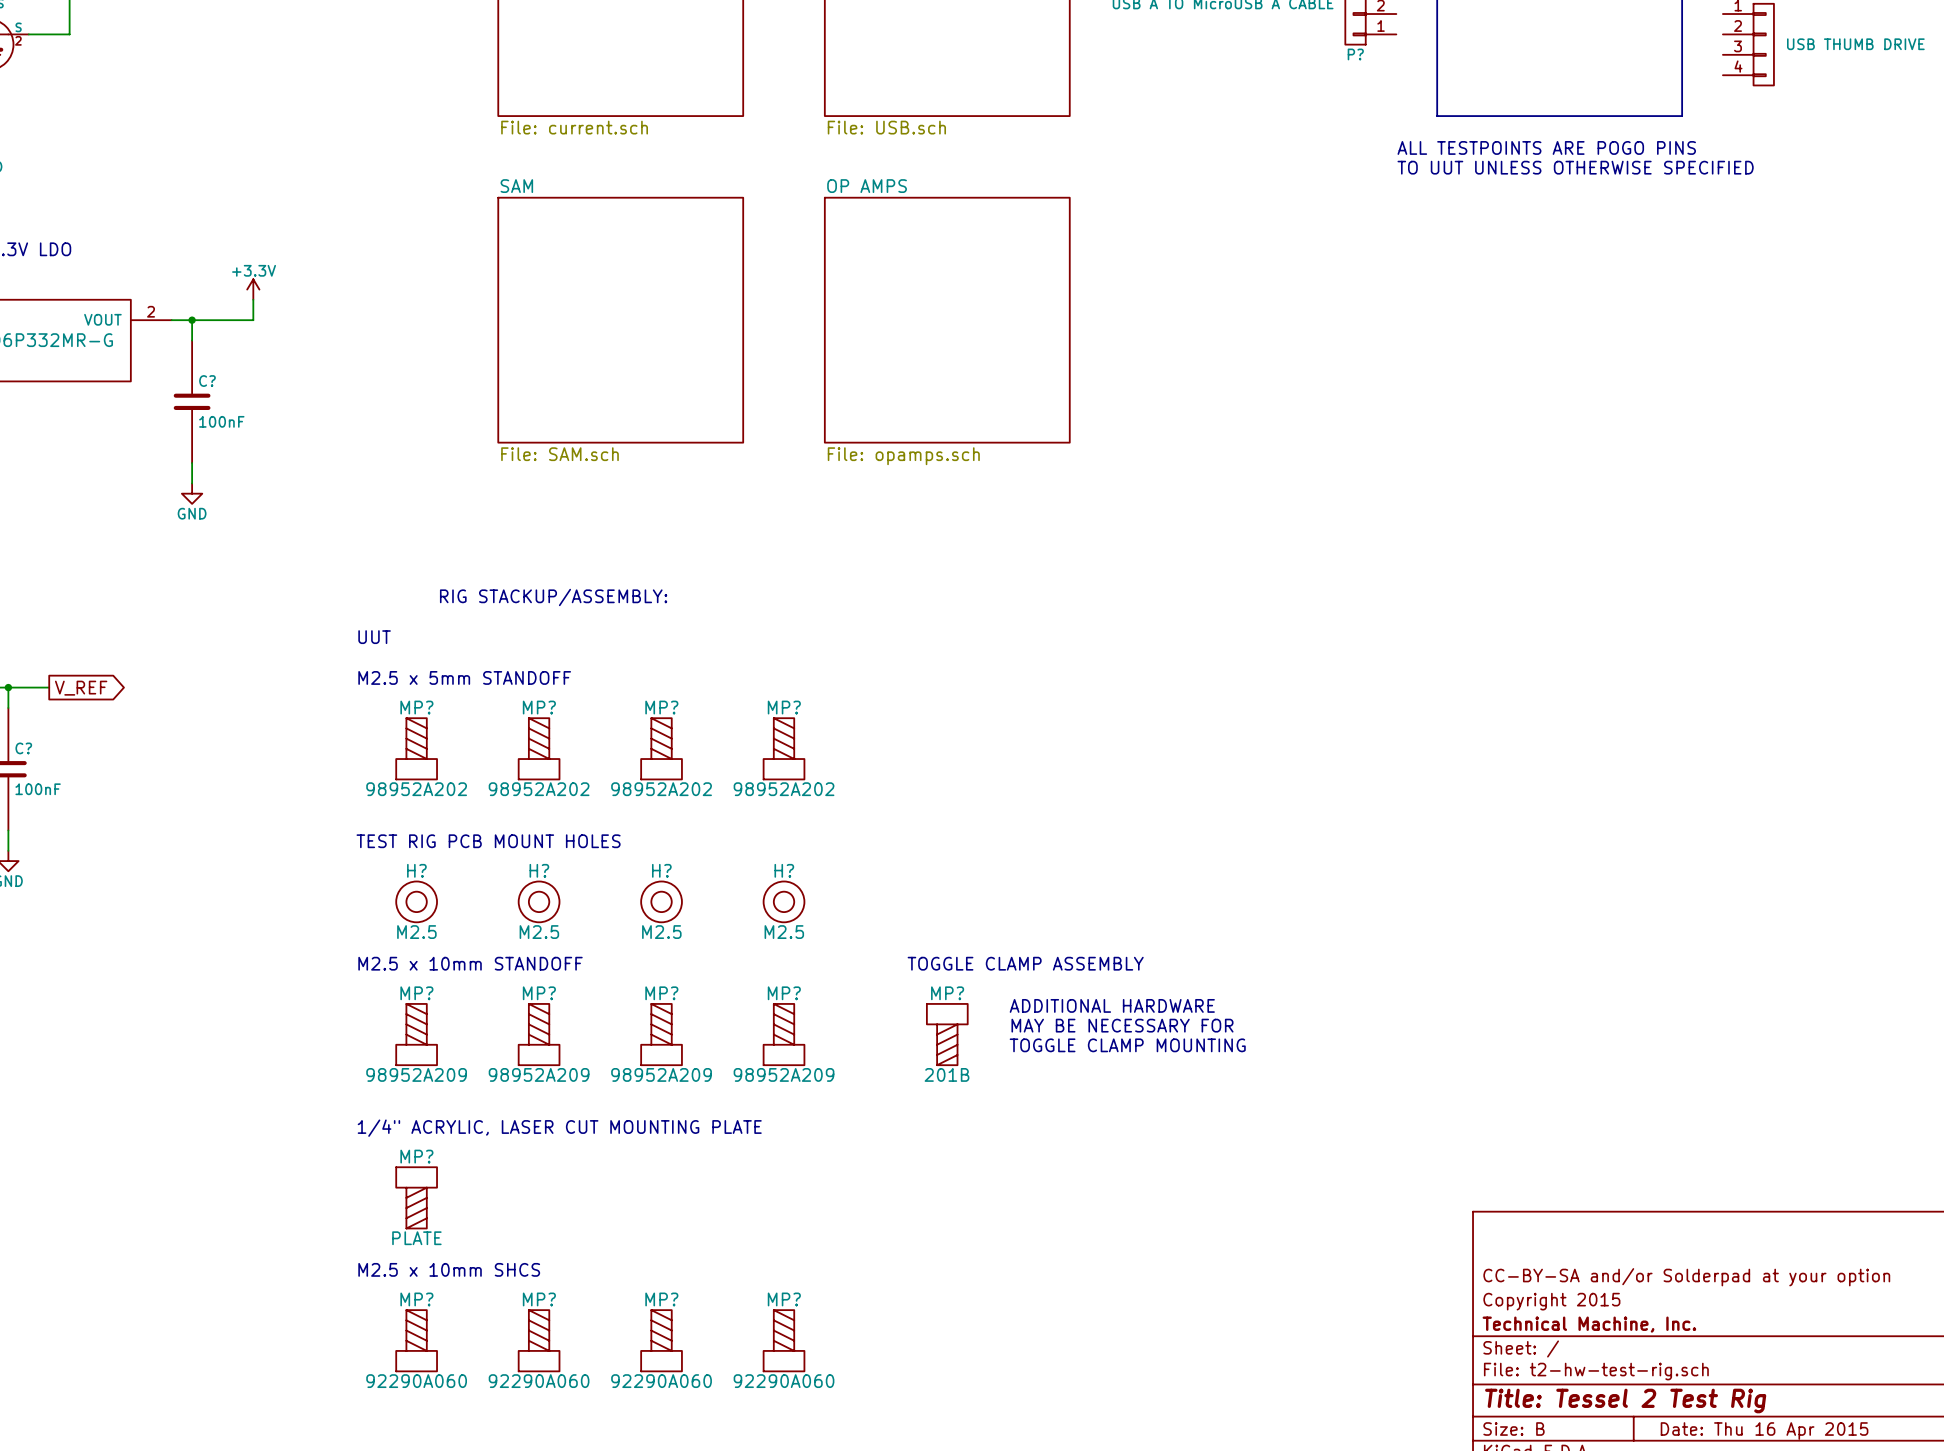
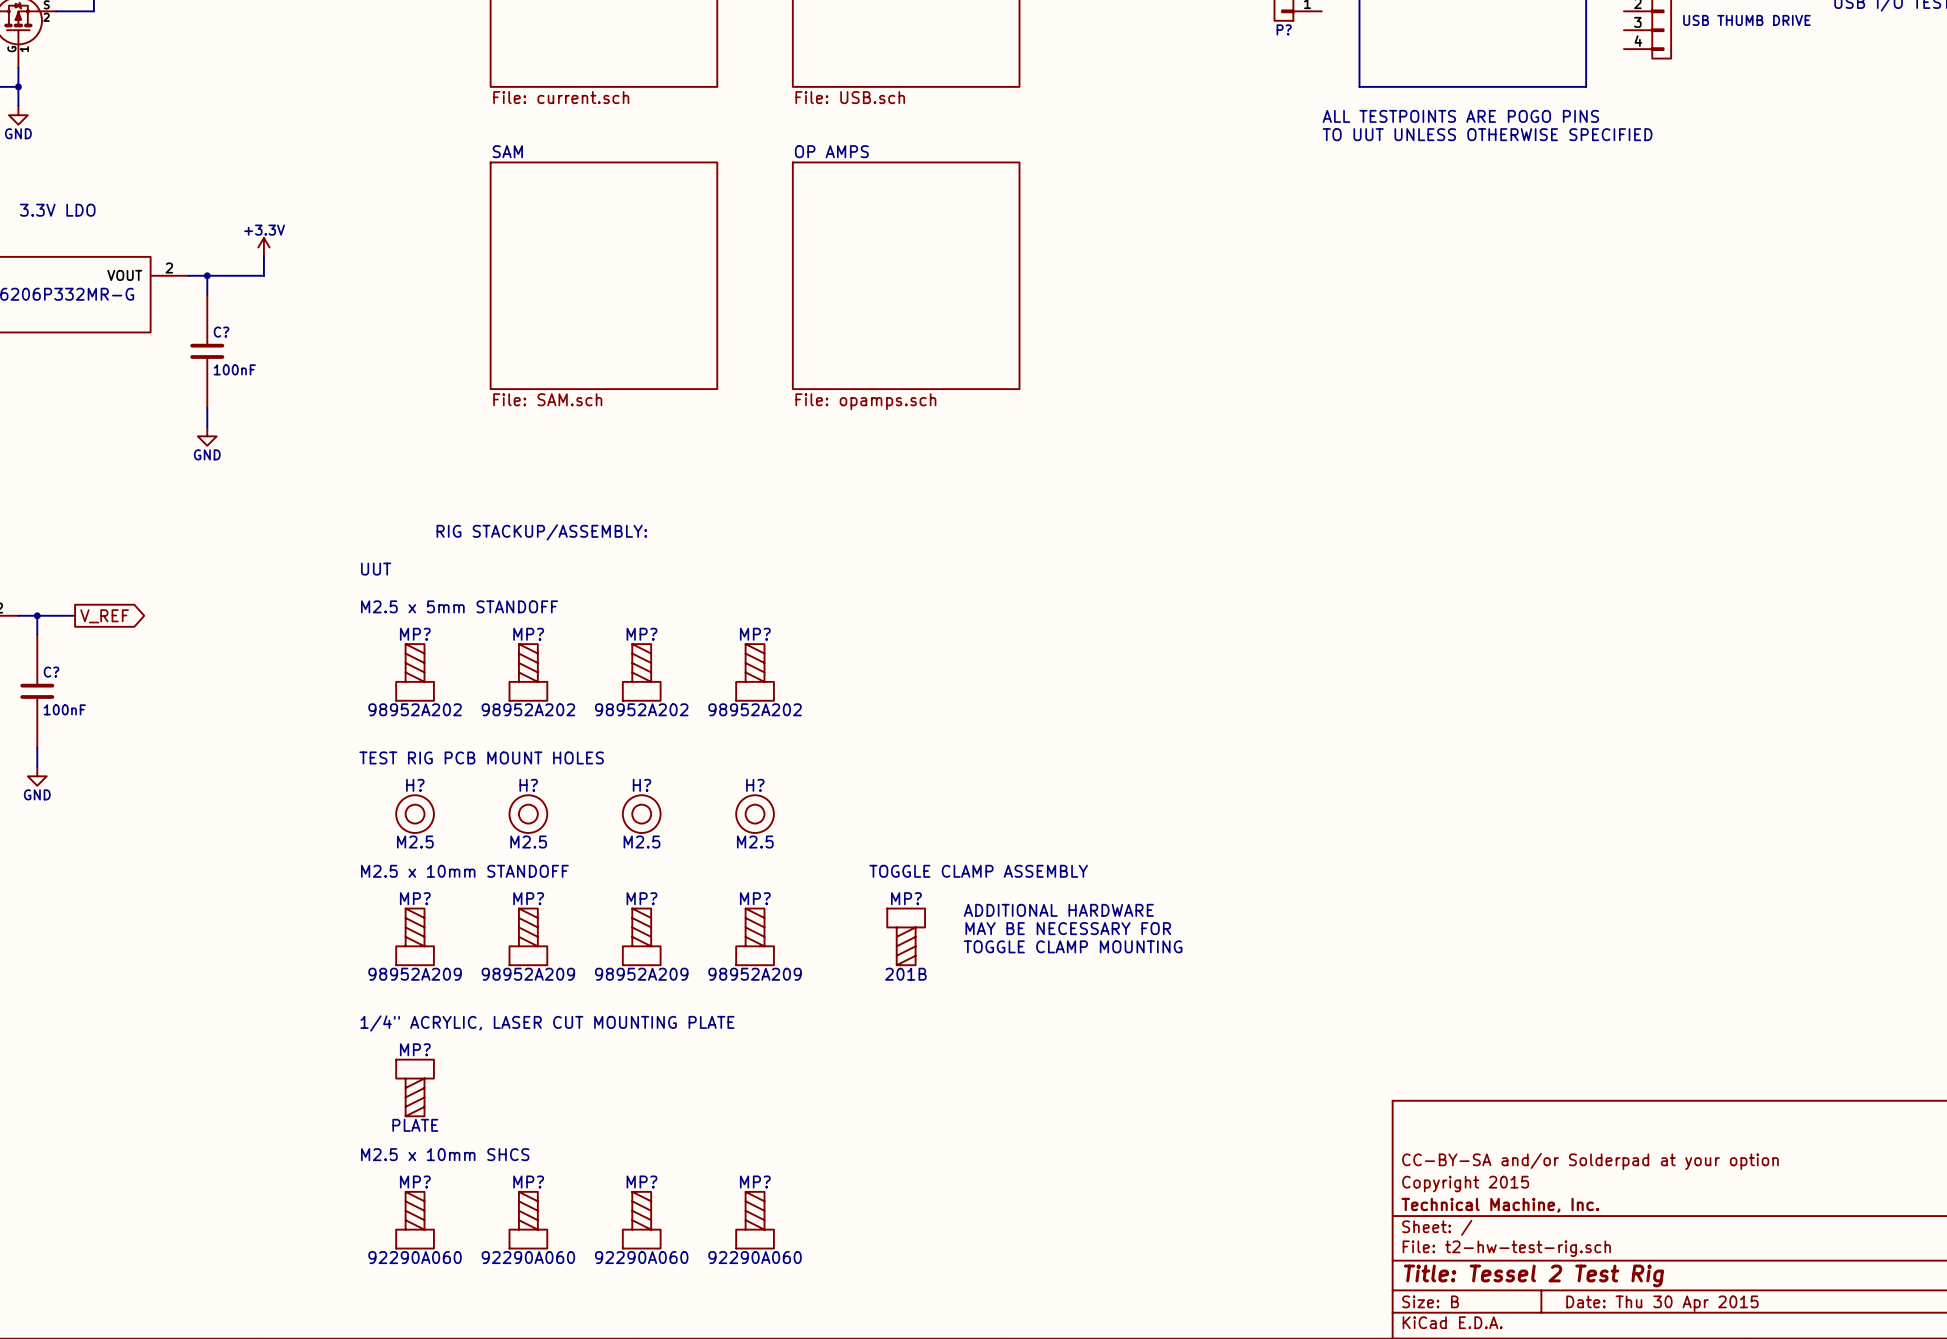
title block: Date: Thu 16 Apr 2015 (1764, 1431) -> Date: Thu 30 Apr 2015 (1662, 1303)

